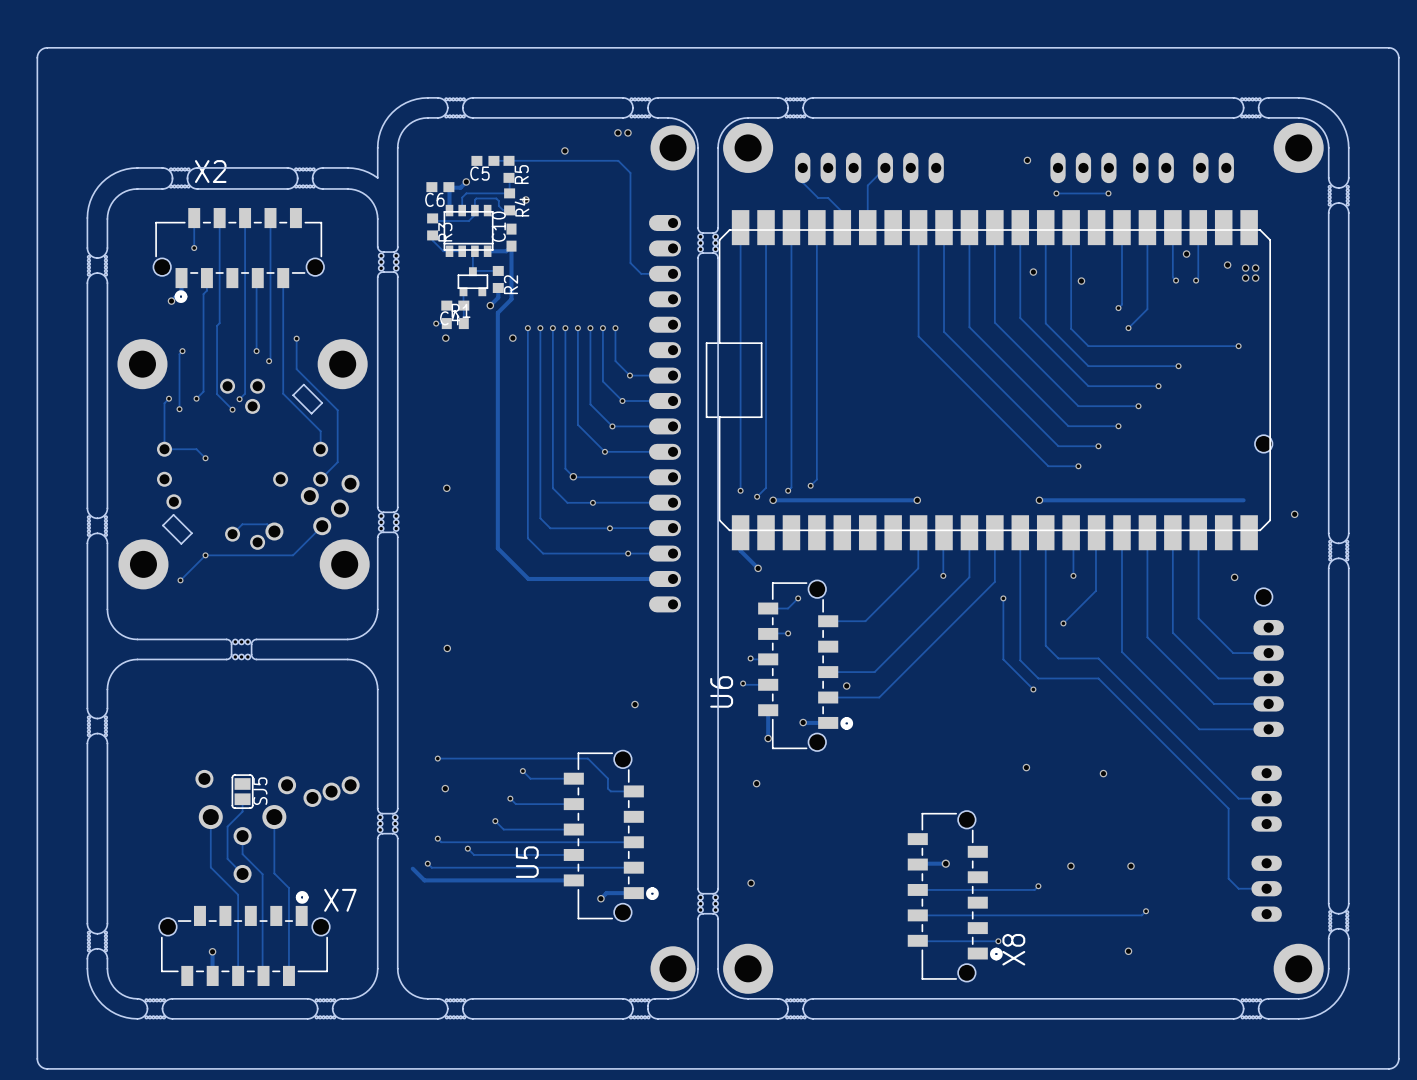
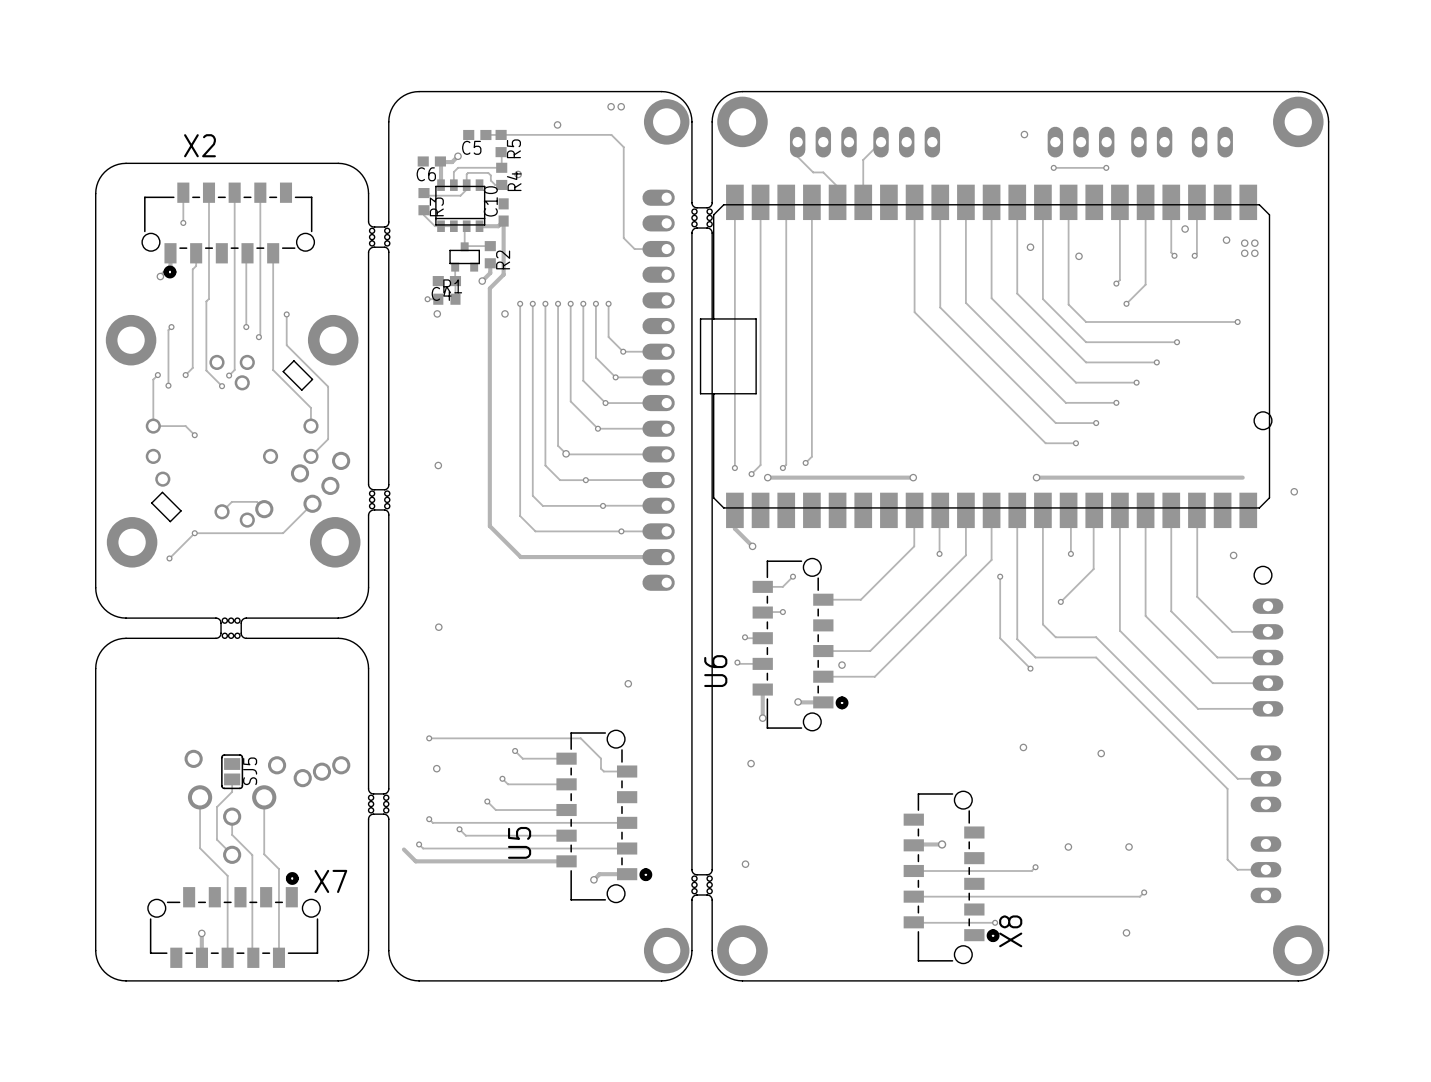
board edge: (1388, 47) (47, 47) (41, 49) (37, 57) (37, 1058) (39, 1064) (47, 1068) (1388, 1068) (1394, 1066) (1398, 1058) (1398, 57) (1395, 50) (1388, 47) -> none
hole: (446, 99) -> none
hole: (449, 99) -> none
hole: (453, 99) -> none
hole: (456, 99) -> none
hole: (460, 99) -> none
hole: (463, 99) -> none
hole: (631, 99) -> none
hole: (634, 99) -> none
hole: (638, 99) -> none
hole: (641, 99) -> none
hole: (645, 99) -> none
hole: (649, 99) -> none
hole: (786, 99) -> none
hole: (790, 99) -> none
hole: (793, 99) -> none
hole: (797, 99) -> none
hole: (800, 99) -> none
hole: (804, 99) -> none
hole: (1242, 99) -> none
hole: (1245, 99) -> none
hole: (1249, 99) -> none
hole: (1252, 99) -> none
hole: (1256, 99) -> none
hole: (1259, 99) -> none
hole: (446, 116) -> none
hole: (449, 116) -> none
hole: (453, 116) -> none
hole: (456, 116) -> none
hole: (460, 116) -> none
hole: (463, 116) -> none
hole: (631, 116) -> none
hole: (634, 116) -> none
hole: (638, 116) -> none
hole: (641, 116) -> none
hole: (645, 116) -> none
hole: (649, 116) -> none
hole: (786, 116) -> none
hole: (790, 116) -> none
hole: (793, 116) -> none
hole: (797, 116) -> none
hole: (800, 116) -> none
hole: (804, 116) -> none
hole: (1242, 116) -> none
hole: (1245, 116) -> none
hole: (1249, 116) -> none
hole: (1252, 116) -> none
hole: (1256, 116) -> none
hole: (1259, 116) -> none
board edge: (437, 117) (443, 115) (447, 109) (445, 101) (440, 98) (416, 99) (401, 105) (388, 116) (380, 131) (378, 142) (377, 177) (358, 169) (320, 168) (313, 172) (312, 180) (316, 186) (322, 188) -> (429, 91) (464, 91)
board edge: (622, 117) (630, 114) (632, 107) (630, 100) (622, 97) (471, 97) (464, 101) (462, 107) (465, 114) (472, 117) -> (616, 91) (651, 91)
board edge: (778, 117) (785, 114) (788, 107) (785, 100) (778, 97) (656, 97) (650, 101) (648, 107) (650, 114) (658, 117) -> (772, 91) (808, 91)
board edge: (1233, 117) (1240, 114) (1243, 107) (1240, 100) (1233, 97) (813, 97) (806, 100) (803, 107) (806, 114) (813, 117) -> none
board edge: (1268, 117) (1261, 114) (1258, 107) (1260, 101) (1267, 97) (1309, 99) (1325, 105) (1334, 112) (1341, 121) (1347, 136) (1348, 179) (1344, 185) (1338, 187) (1331, 185) (1328, 177) -> (1267, 91) (1232, 91)
hole: (171, 169) -> none
hole: (174, 169) -> none
hole: (178, 169) -> none
hole: (181, 169) -> none
hole: (185, 169) -> none
hole: (188, 169) -> none
hole: (296, 169) -> none
hole: (299, 169) -> none
hole: (303, 169) -> none
hole: (306, 169) -> none
hole: (310, 169) -> none
hole: (313, 169) -> none
hole: (171, 186) -> none
hole: (174, 186) -> none
hole: (178, 186) -> none
hole: (181, 186) -> none
hole: (185, 186) -> none
hole: (188, 186) -> none
hole: (296, 186) -> none
hole: (299, 186) -> none
hole: (303, 186) -> none
hole: (306, 186) -> none
hole: (310, 186) -> none
hole: (313, 186) -> none
hole: (1329, 186) -> none
hole: (1347, 186) -> none
board edge: (162, 188) (169, 186) (172, 178) (170, 171) (163, 168) (126, 169) (110, 175) (102, 182) (95, 191) (88, 206) (87, 249) (91, 255) (97, 258) (104, 255) (107, 248) -> (151, 163) (186, 163)
board edge: (287, 188) (294, 186) (297, 178) (294, 170) (287, 167) (194, 168) (188, 172) (187, 180) (191, 186) (197, 188) -> (277, 163) (312, 163)
hole: (1329, 190) -> none
hole: (1347, 190) -> none
hole: (1329, 193) -> none
hole: (1347, 193) -> none
hole: (1329, 197) -> none
hole: (1347, 197) -> none
hole: (1329, 200) -> none
hole: (1347, 200) -> none
hole: (1329, 204) -> none
hole: (1347, 204) -> none
board edge: (1328, 213) (1331, 205) (1338, 202) (1345, 205) (1348, 213) (1348, 533) (1345, 540) (1338, 543) (1331, 540) (1328, 533) -> (1328, 187) (1328, 152)
hole: (88, 257) -> none
hole: (105, 257) -> none
hole: (88, 260) -> none
hole: (105, 260) -> none
hole: (88, 264) -> none
hole: (105, 264) -> none
hole: (88, 267) -> none
hole: (105, 267) -> none
hole: (88, 271) -> none
hole: (105, 271) -> none
hole: (88, 274) -> none
hole: (105, 274) -> none
board edge: (107, 283) (104, 275) (97, 273) (90, 275) (87, 283) (87, 509) (91, 516) (97, 518) (104, 515) (107, 508) -> (95, 258) (95, 222)
hole: (88, 517) -> none
hole: (105, 517) -> none
hole: (88, 520) -> none
hole: (105, 520) -> none
hole: (88, 524) -> none
hole: (105, 524) -> none
hole: (88, 527) -> none
hole: (105, 527) -> none
hole: (88, 531) -> none
hole: (105, 531) -> none
hole: (88, 534) -> none
hole: (105, 534) -> none
hole: (1330, 541) -> none
hole: (1347, 541) -> none
board edge: (107, 543) (104, 536) (97, 533) (90, 536) (87, 543) (87, 709) (91, 716) (97, 718) (104, 715) (107, 708) -> (95, 521) (95, 485)
hole: (1330, 545) -> none
hole: (1347, 545) -> none
hole: (1330, 548) -> none
hole: (1347, 548) -> none
hole: (1330, 552) -> none
hole: (1347, 552) -> none
hole: (1330, 555) -> none
hole: (1347, 555) -> none
hole: (1330, 559) -> none
hole: (1347, 559) -> none
board edge: (1328, 568) (1331, 561) (1338, 558) (1345, 561) (1348, 568) (1348, 903) (1345, 910) (1338, 913) (1331, 910) (1328, 903) -> (1328, 546) (1328, 510)
hole: (88, 717) -> none
hole: (105, 717) -> none
hole: (88, 721) -> none
hole: (105, 721) -> none
hole: (88, 724) -> none
hole: (105, 724) -> none
hole: (88, 728) -> none
hole: (105, 728) -> none
hole: (88, 731) -> none
hole: (105, 731) -> none
hole: (88, 735) -> none
hole: (105, 735) -> none
board edge: (107, 743) (104, 736) (97, 733) (90, 736) (87, 743) (87, 925) (91, 931) (97, 933) (104, 930) (107, 923) -> (95, 723) (95, 687)
hole: (1330, 912) -> none
hole: (1347, 912) -> none
hole: (1330, 915) -> none
hole: (1347, 915) -> none
hole: (1330, 919) -> none
hole: (1347, 919) -> none
hole: (1330, 922) -> none
hole: (1347, 922) -> none
board edge: none -> (95, 905) (95, 940)
hole: (1330, 926) -> none
hole: (1347, 926) -> none
hole: (1330, 929) -> none
hole: (1347, 929) -> none
hole: (88, 932) -> none
hole: (105, 932) -> none
hole: (88, 936) -> none
hole: (105, 936) -> none
board edge: (1328, 938) (1331, 931) (1338, 928) (1344, 930) (1348, 937) (1347, 979) (1341, 995) (1334, 1004) (1325, 1011) (1309, 1017) (1267, 1018) (1260, 1014) (1258, 1008) (1261, 1001) (1268, 998) -> (1328, 920) (1328, 884)
hole: (88, 939) -> none
hole: (105, 939) -> none
hole: (88, 943) -> none
hole: (105, 943) -> none
hole: (88, 946) -> none
hole: (105, 946) -> none
hole: (88, 950) -> none
hole: (105, 950) -> none
board edge: (107, 958) (105, 952) (98, 948) (91, 950) (87, 956) (88, 979) (98, 1000) (115, 1013) (137, 1018) (144, 1015) (147, 1008) (144, 1001) (137, 998) -> (161, 980) (126, 980)
board edge: (307, 998) (314, 1001) (317, 1008) (314, 1015) (307, 1018) (171, 1018) (164, 1014) (162, 1008) (165, 1001) (172, 998) -> (297, 980) (333, 980)
board edge: (437, 998) (444, 1001) (447, 1008) (444, 1015) (437, 1018) (340, 1018) (334, 1014) (332, 1007) (336, 1000) (342, 998) -> (429, 980) (464, 980)
board edge: (622, 998) (630, 1001) (632, 1008) (630, 1015) (622, 1018) (471, 1018) (464, 1014) (462, 1008) (465, 1001) (472, 998) -> none
board edge: (778, 998) (785, 1001) (788, 1008) (785, 1015) (778, 1018) (656, 1018) (650, 1015) (648, 1010) (648, 1002) (655, 998) -> (616, 980) (648, 980)
board edge: none -> (808, 980) (772, 980)
board edge: (1233, 998) (1240, 1001) (1243, 1008) (1240, 1015) (1233, 1018) (813, 1018) (806, 1015) (803, 1008) (806, 1001) (813, 998) -> (1232, 980) (1267, 980)
hole: (146, 1000) -> none
hole: (149, 1000) -> none
hole: (153, 1000) -> none
hole: (156, 1000) -> none
hole: (160, 1000) -> none
hole: (163, 1000) -> none
hole: (316, 1000) -> none
hole: (320, 1000) -> none
hole: (323, 1000) -> none
hole: (327, 1000) -> none
hole: (330, 1000) -> none
hole: (334, 1000) -> none
hole: (446, 1000) -> none
hole: (450, 1000) -> none
hole: (453, 1000) -> none
hole: (457, 1000) -> none
hole: (460, 1000) -> none
hole: (464, 1000) -> none
hole: (630, 1000) -> none
hole: (634, 1000) -> none
hole: (637, 1000) -> none
hole: (641, 1000) -> none
hole: (645, 1000) -> none
hole: (648, 1000) -> none
hole: (787, 1000) -> none
hole: (790, 1000) -> none
hole: (794, 1000) -> none
hole: (797, 1000) -> none
hole: (801, 1000) -> none
hole: (804, 1000) -> none
hole: (1242, 1000) -> none
hole: (1246, 1000) -> none
hole: (1249, 1000) -> none
hole: (1253, 1000) -> none
hole: (1256, 1000) -> none
hole: (1260, 1000) -> none
hole: (146, 1017) -> none
hole: (149, 1017) -> none
hole: (153, 1017) -> none
hole: (156, 1017) -> none
hole: (160, 1017) -> none
hole: (163, 1017) -> none
hole: (316, 1017) -> none
hole: (320, 1017) -> none
hole: (323, 1017) -> none
hole: (327, 1017) -> none
hole: (330, 1017) -> none
hole: (334, 1017) -> none
hole: (446, 1017) -> none
hole: (450, 1017) -> none
hole: (453, 1017) -> none
hole: (457, 1017) -> none
hole: (460, 1017) -> none
hole: (464, 1017) -> none
hole: (630, 1017) -> none
hole: (634, 1017) -> none
hole: (637, 1017) -> none
hole: (641, 1017) -> none
hole: (645, 1017) -> none
hole: (648, 1017) -> none
hole: (787, 1017) -> none
hole: (790, 1017) -> none
hole: (794, 1017) -> none
hole: (797, 1017) -> none
hole: (801, 1017) -> none
hole: (804, 1017) -> none
hole: (1242, 1017) -> none
hole: (1246, 1017) -> none
hole: (1249, 1017) -> none
hole: (1253, 1017) -> none
hole: (1256, 1017) -> none
hole: (1260, 1017) -> none

